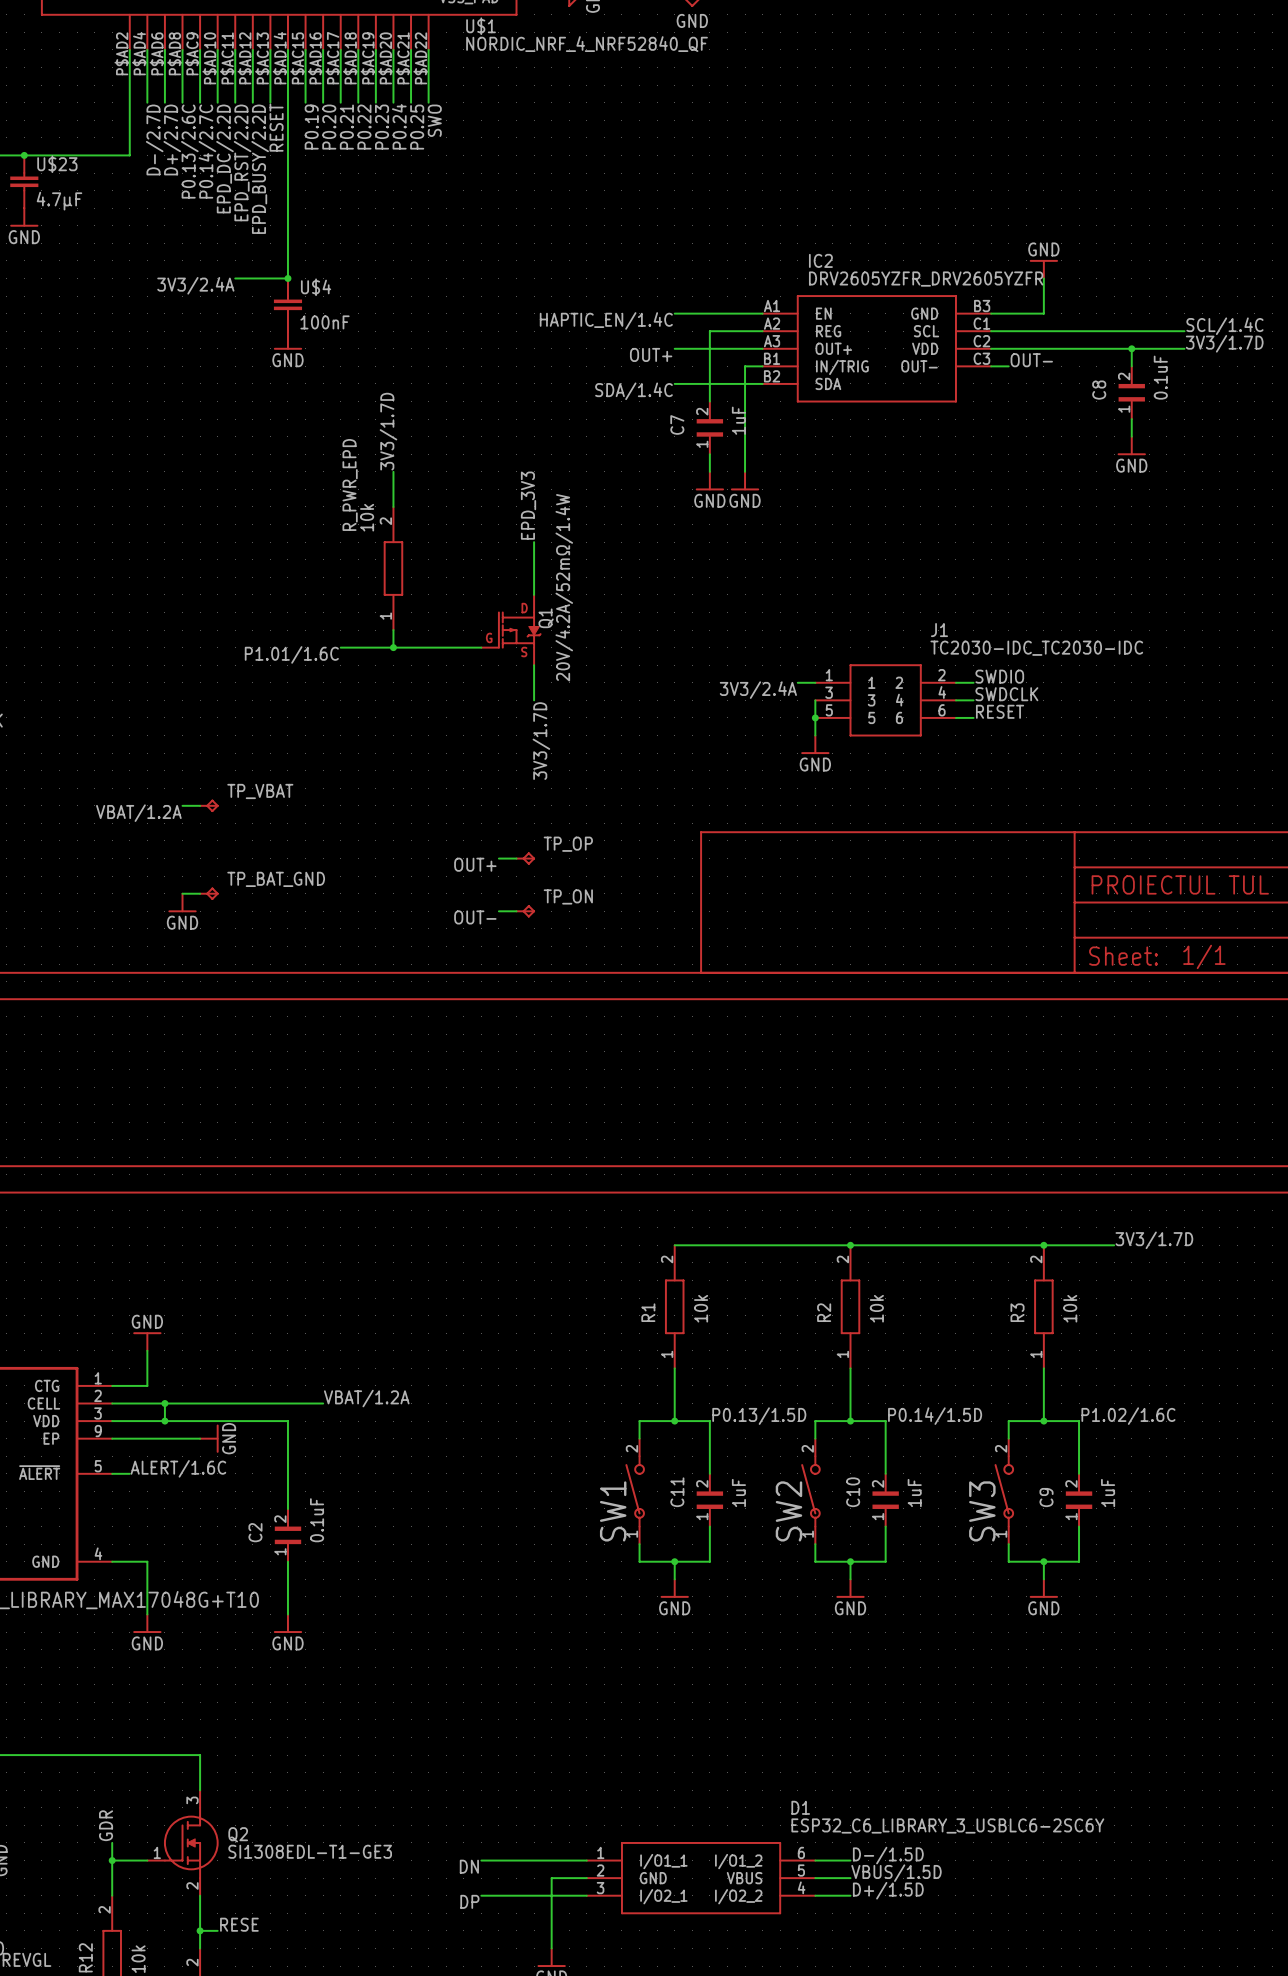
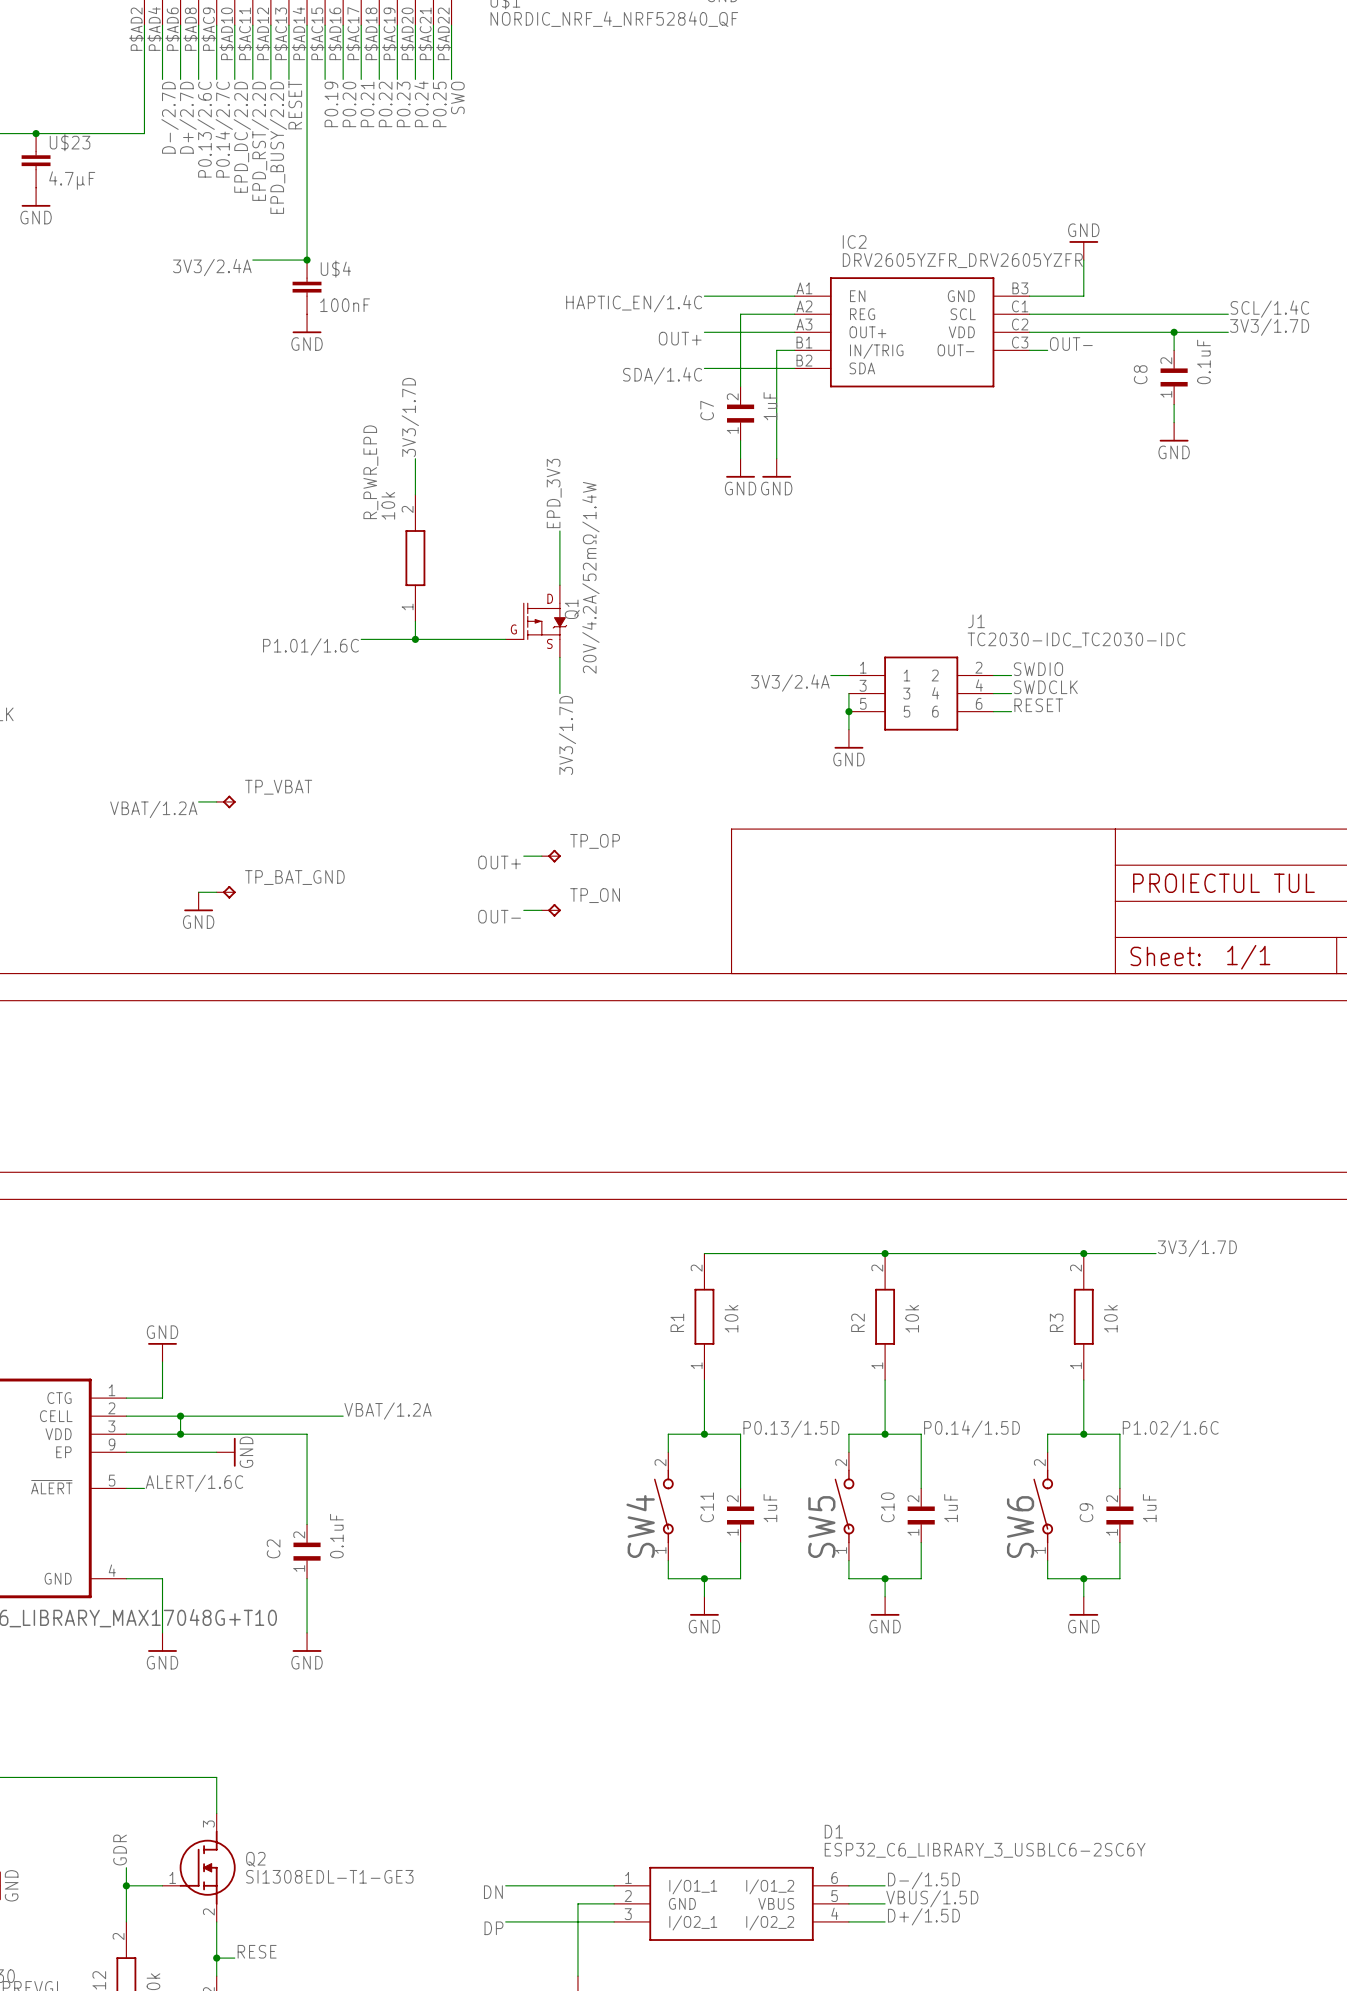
SW1 name: SW1 (613, 1511) -> SW4 (640, 1526)
SW2 name: SW2 (788, 1511) -> SW5 (821, 1527)
SW3 name: SW3 (982, 1511) -> SW6 (1020, 1527)

